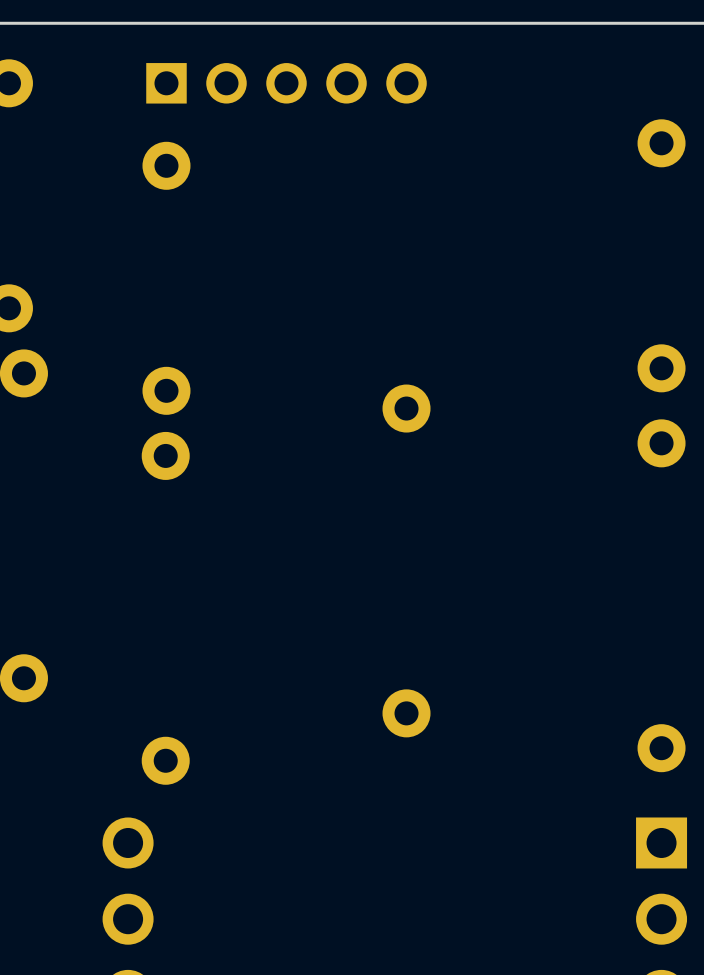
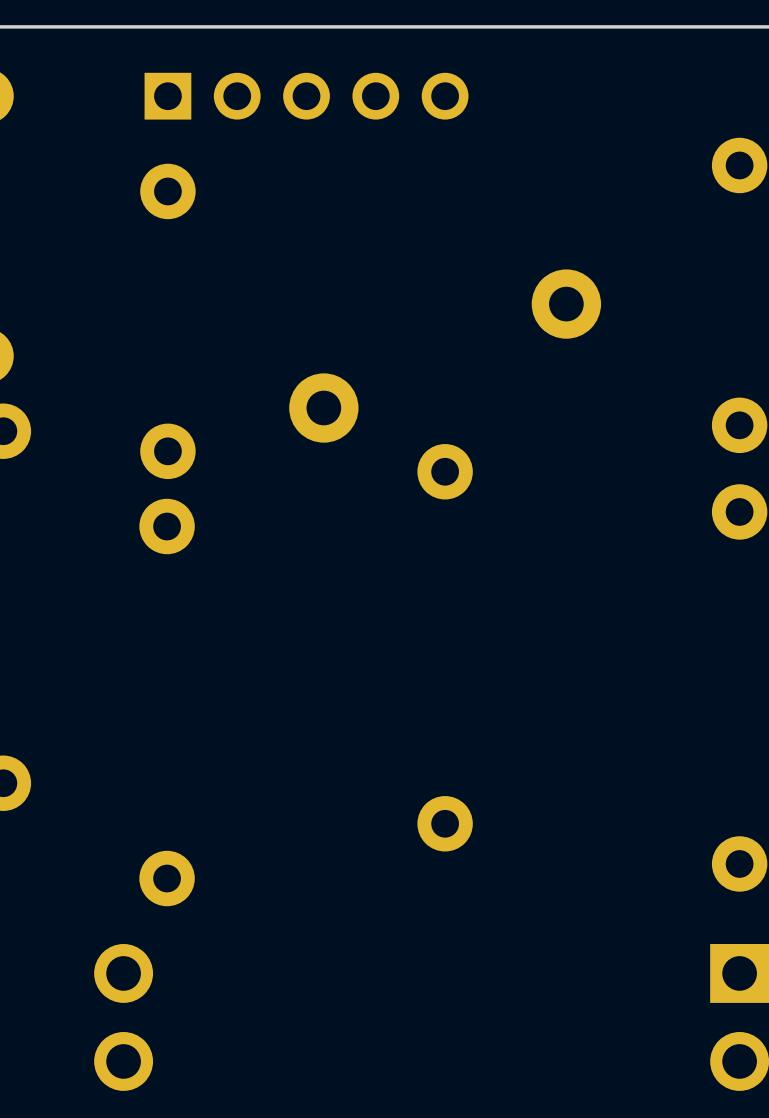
part: none -> (566, 304)
part: none -> (323, 408)

